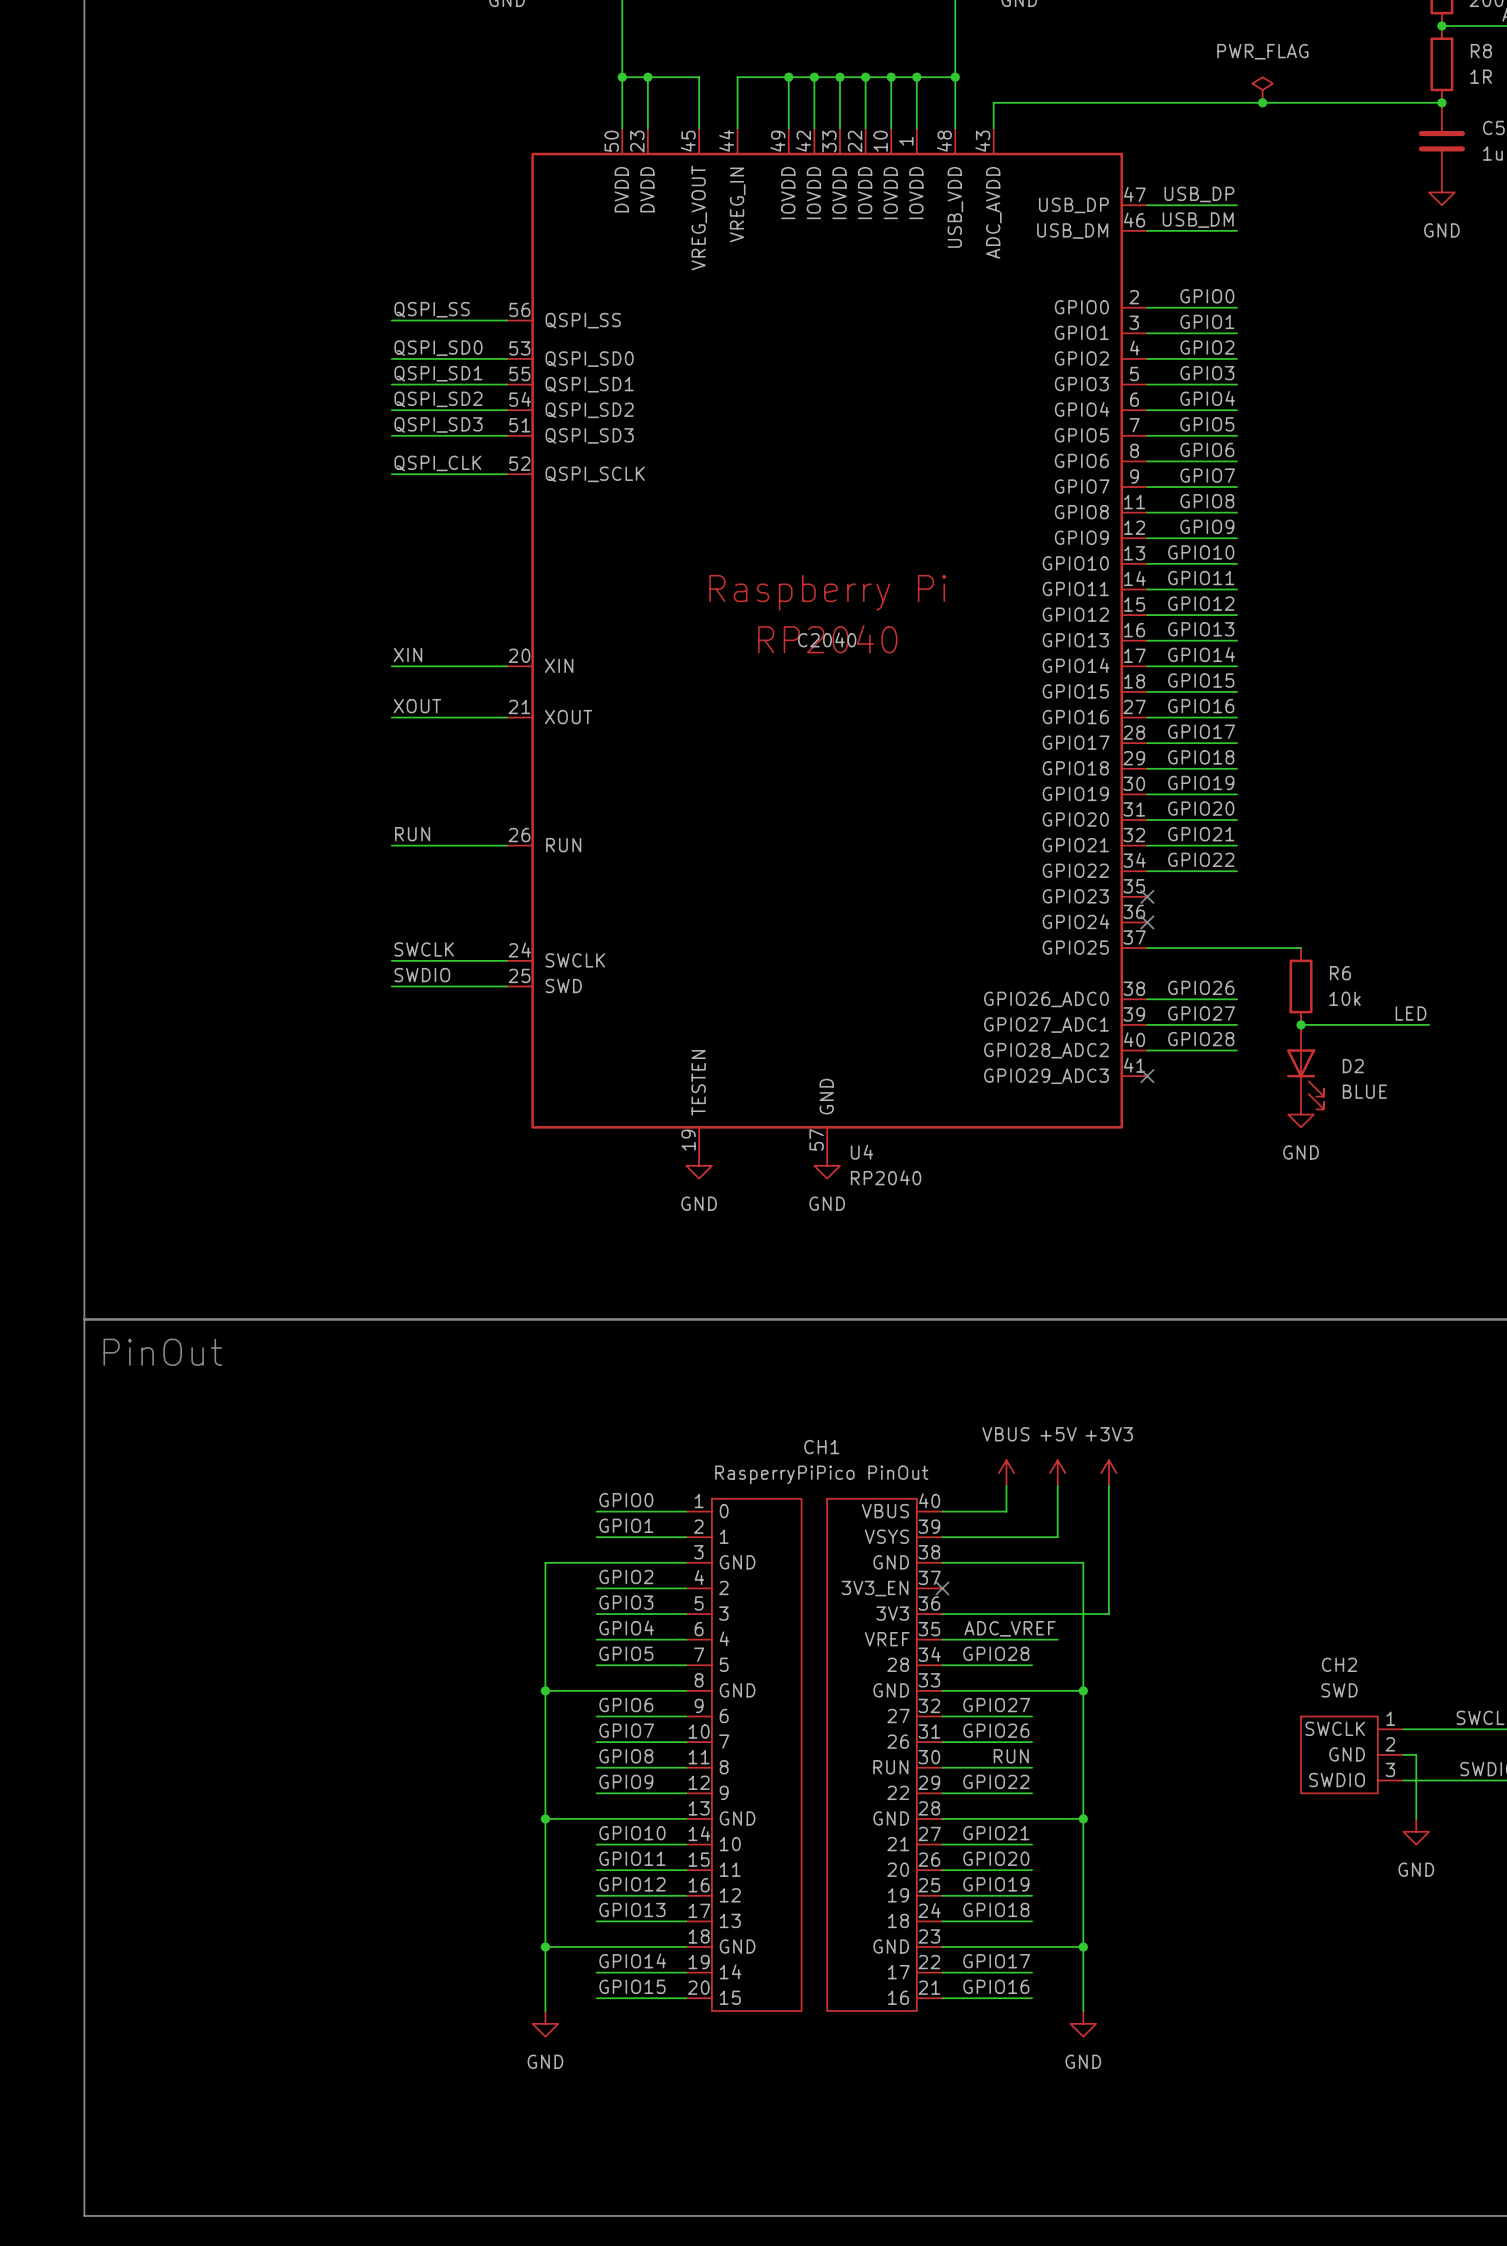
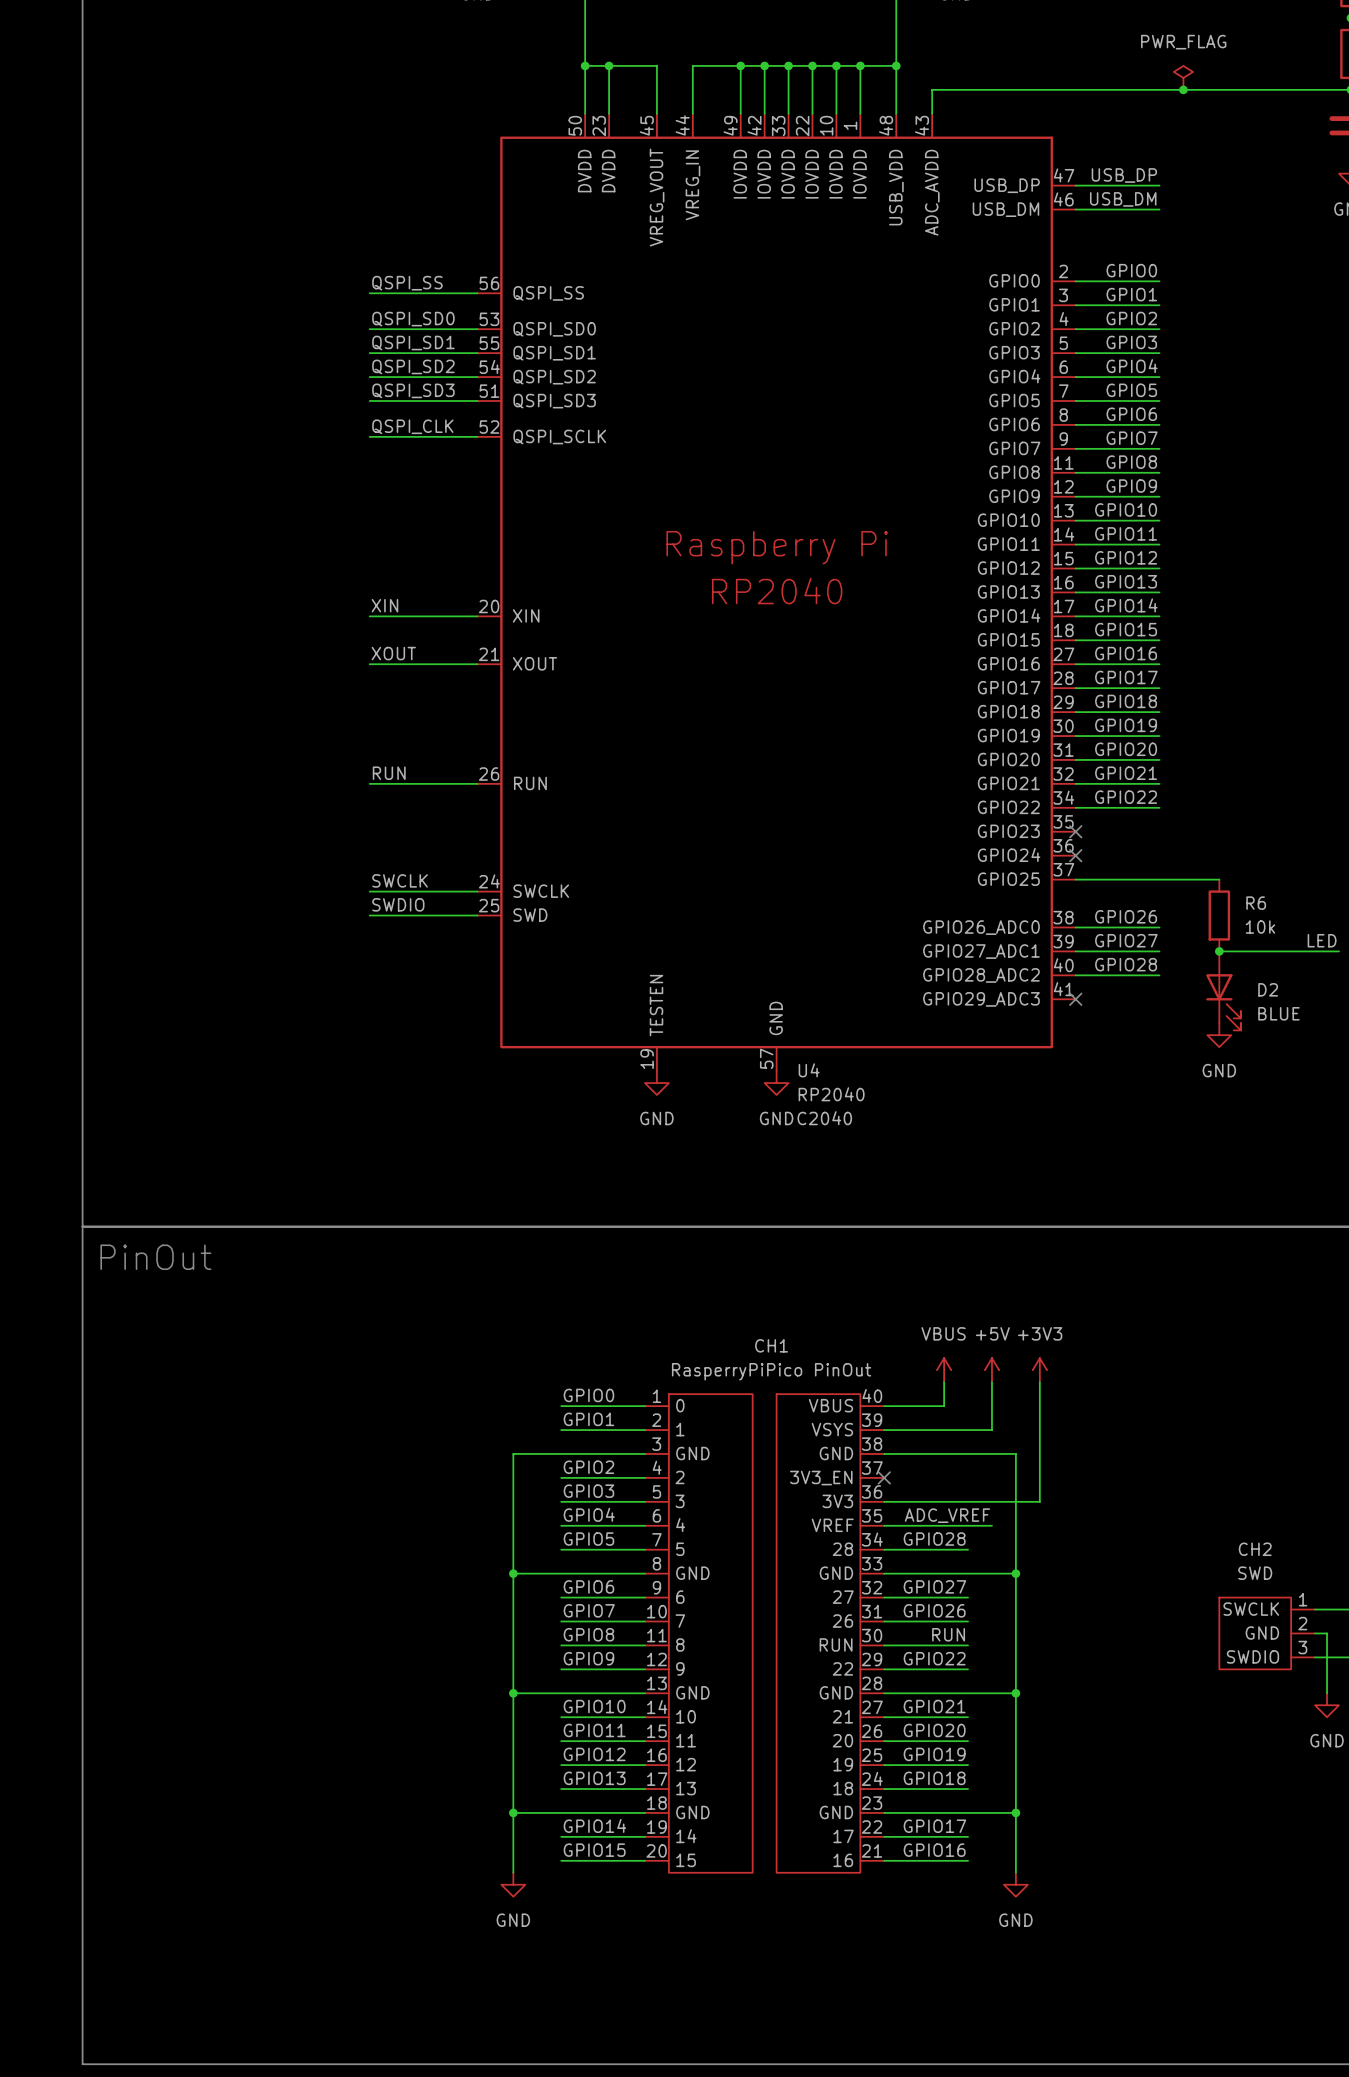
U4 text position: C2040 (827, 639) -> C2040 (824, 1118)

